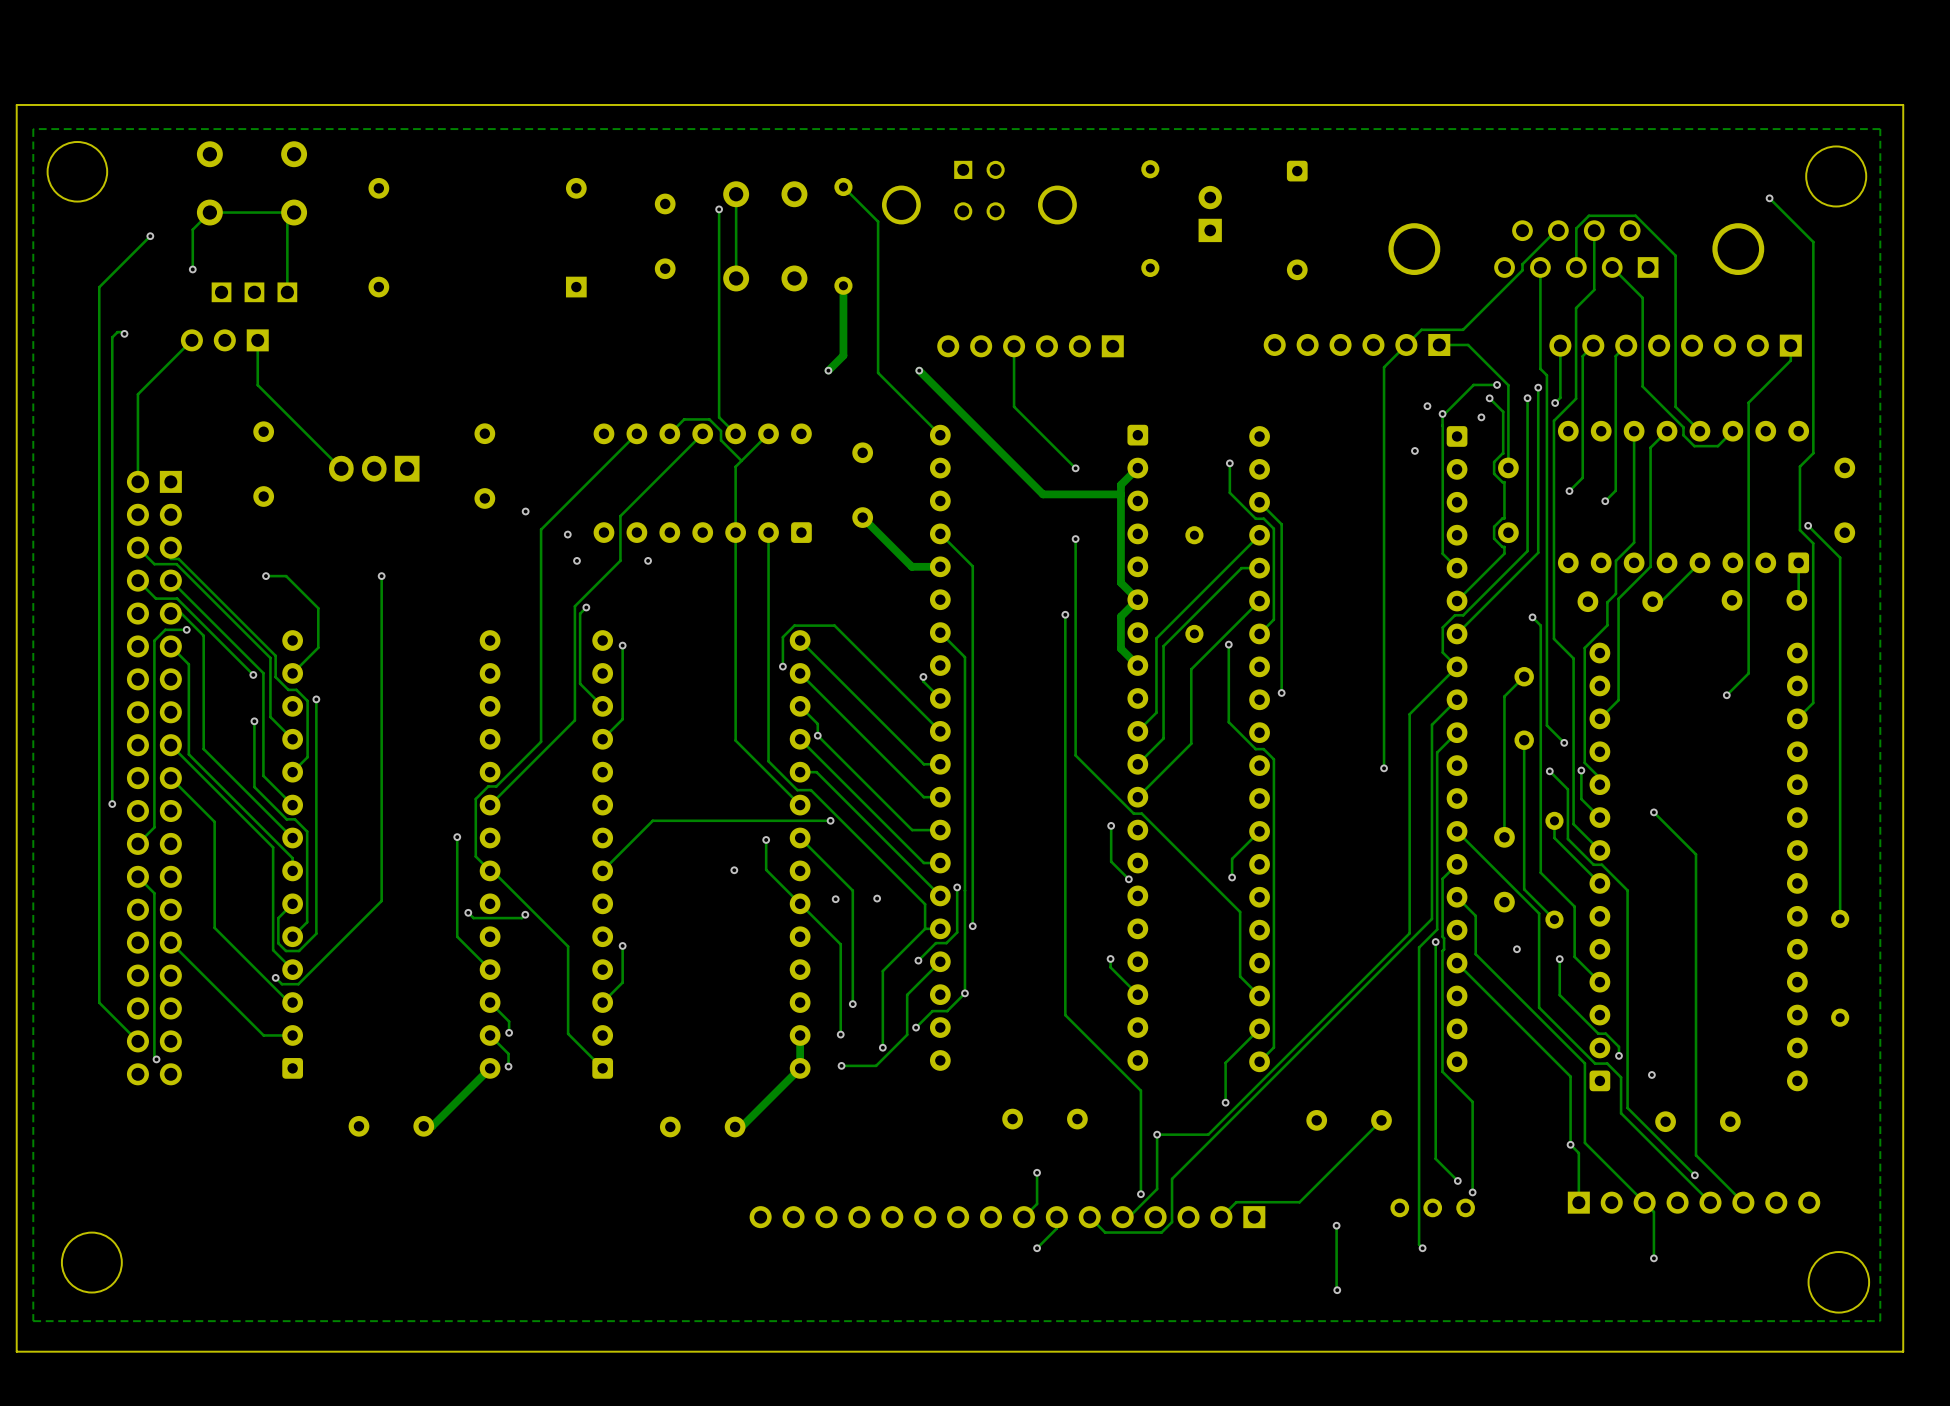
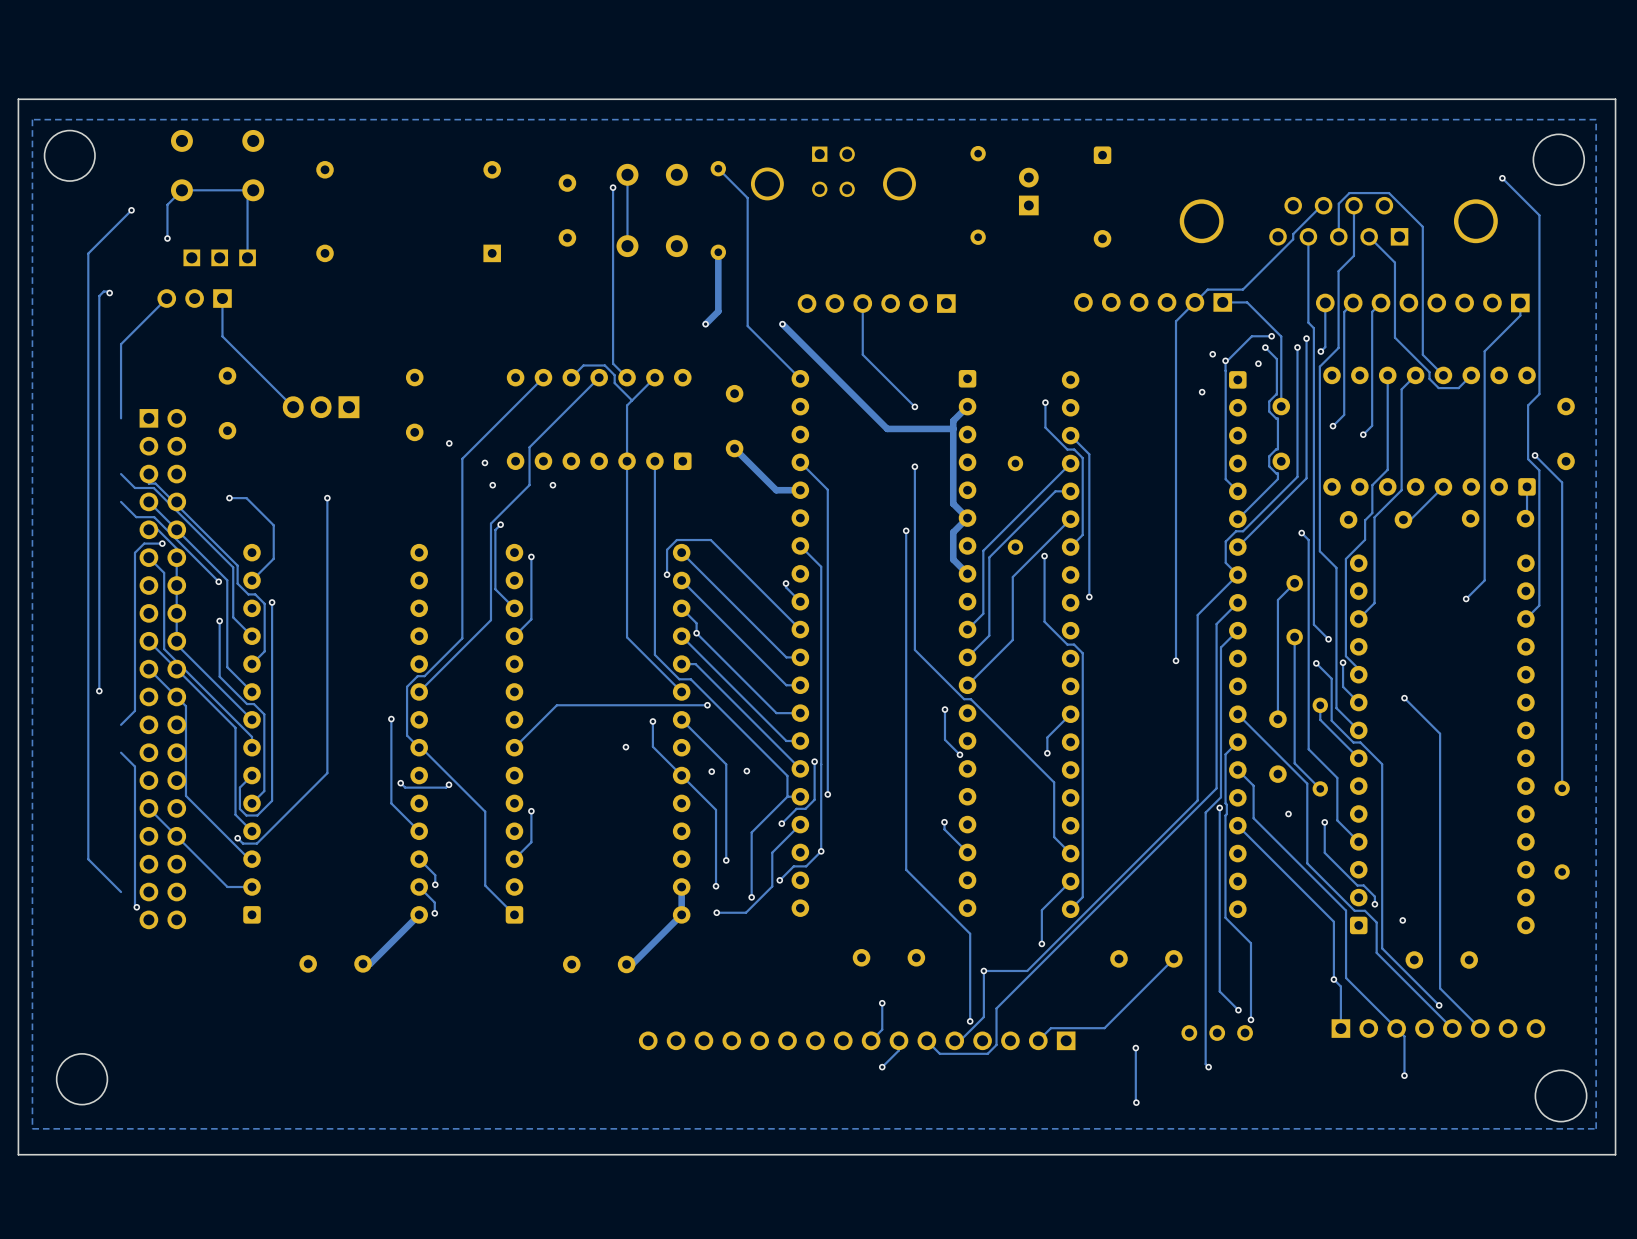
part: (154, 778) -> none
part: none -> (162, 669)

